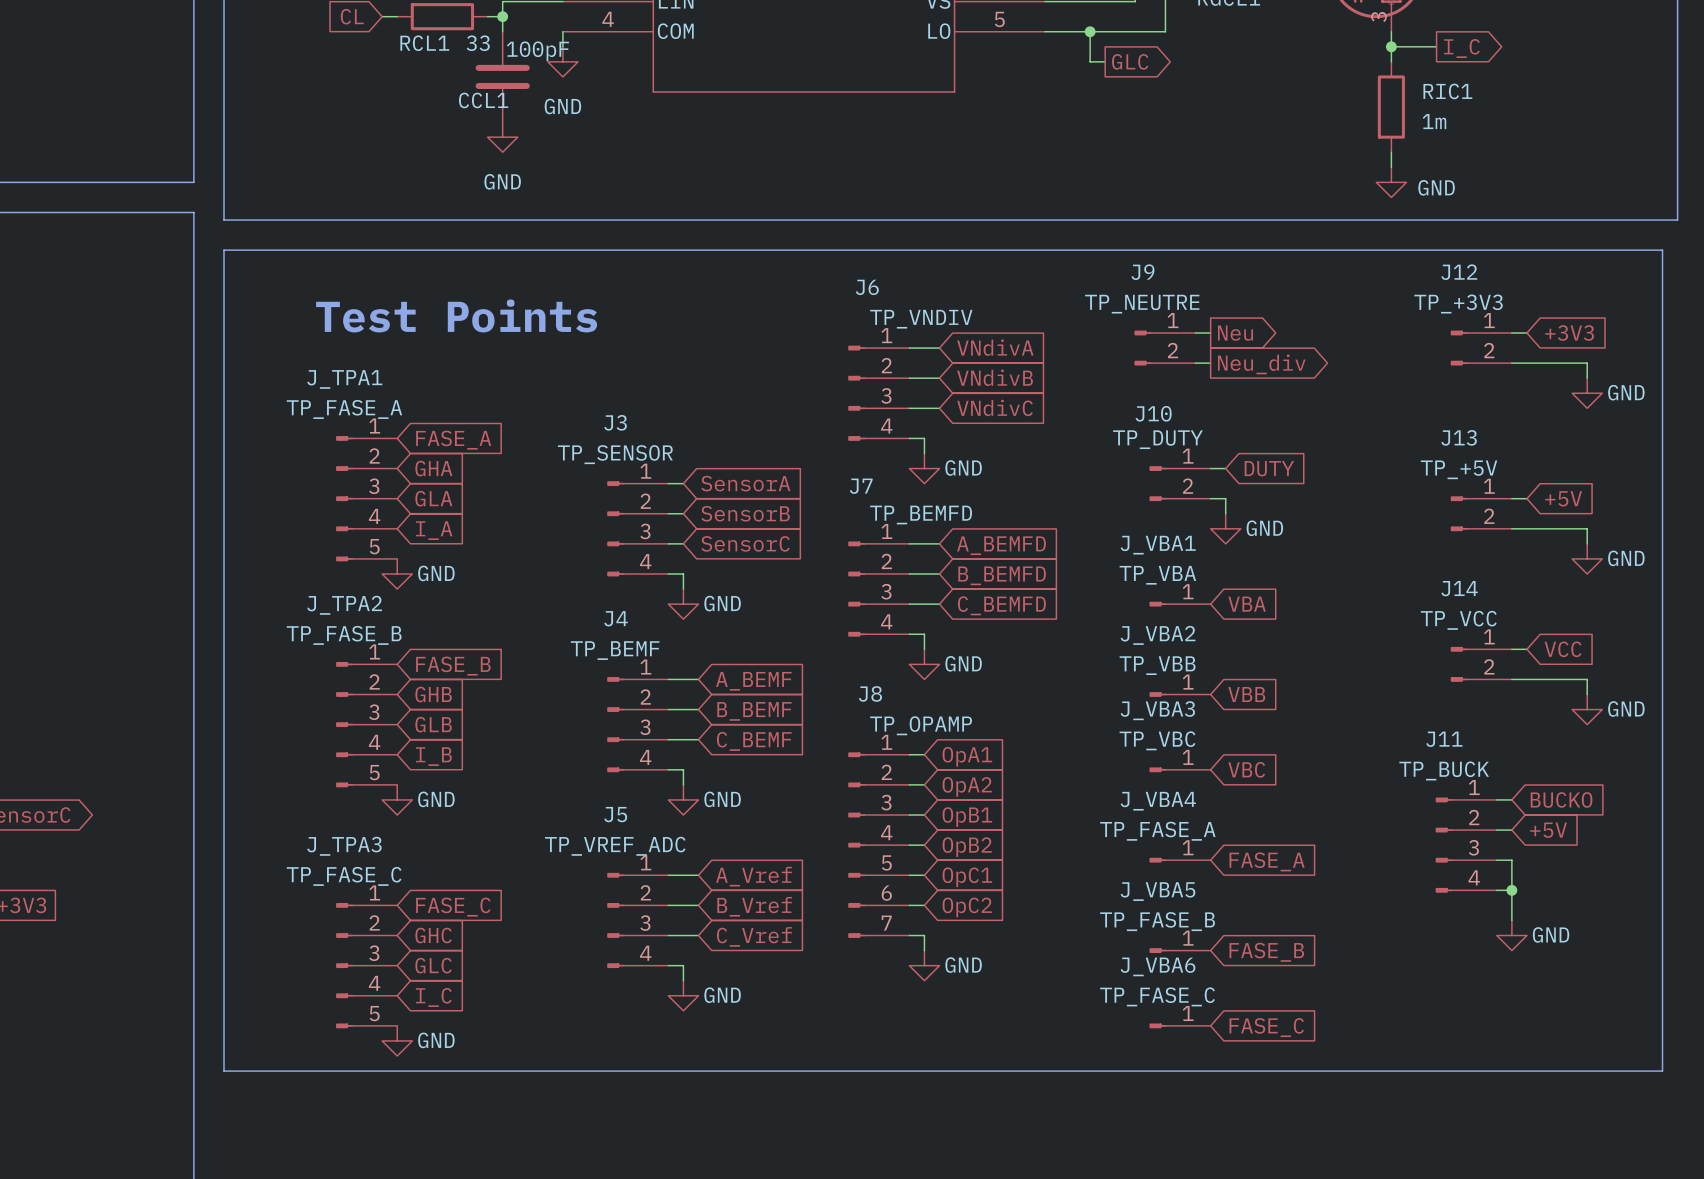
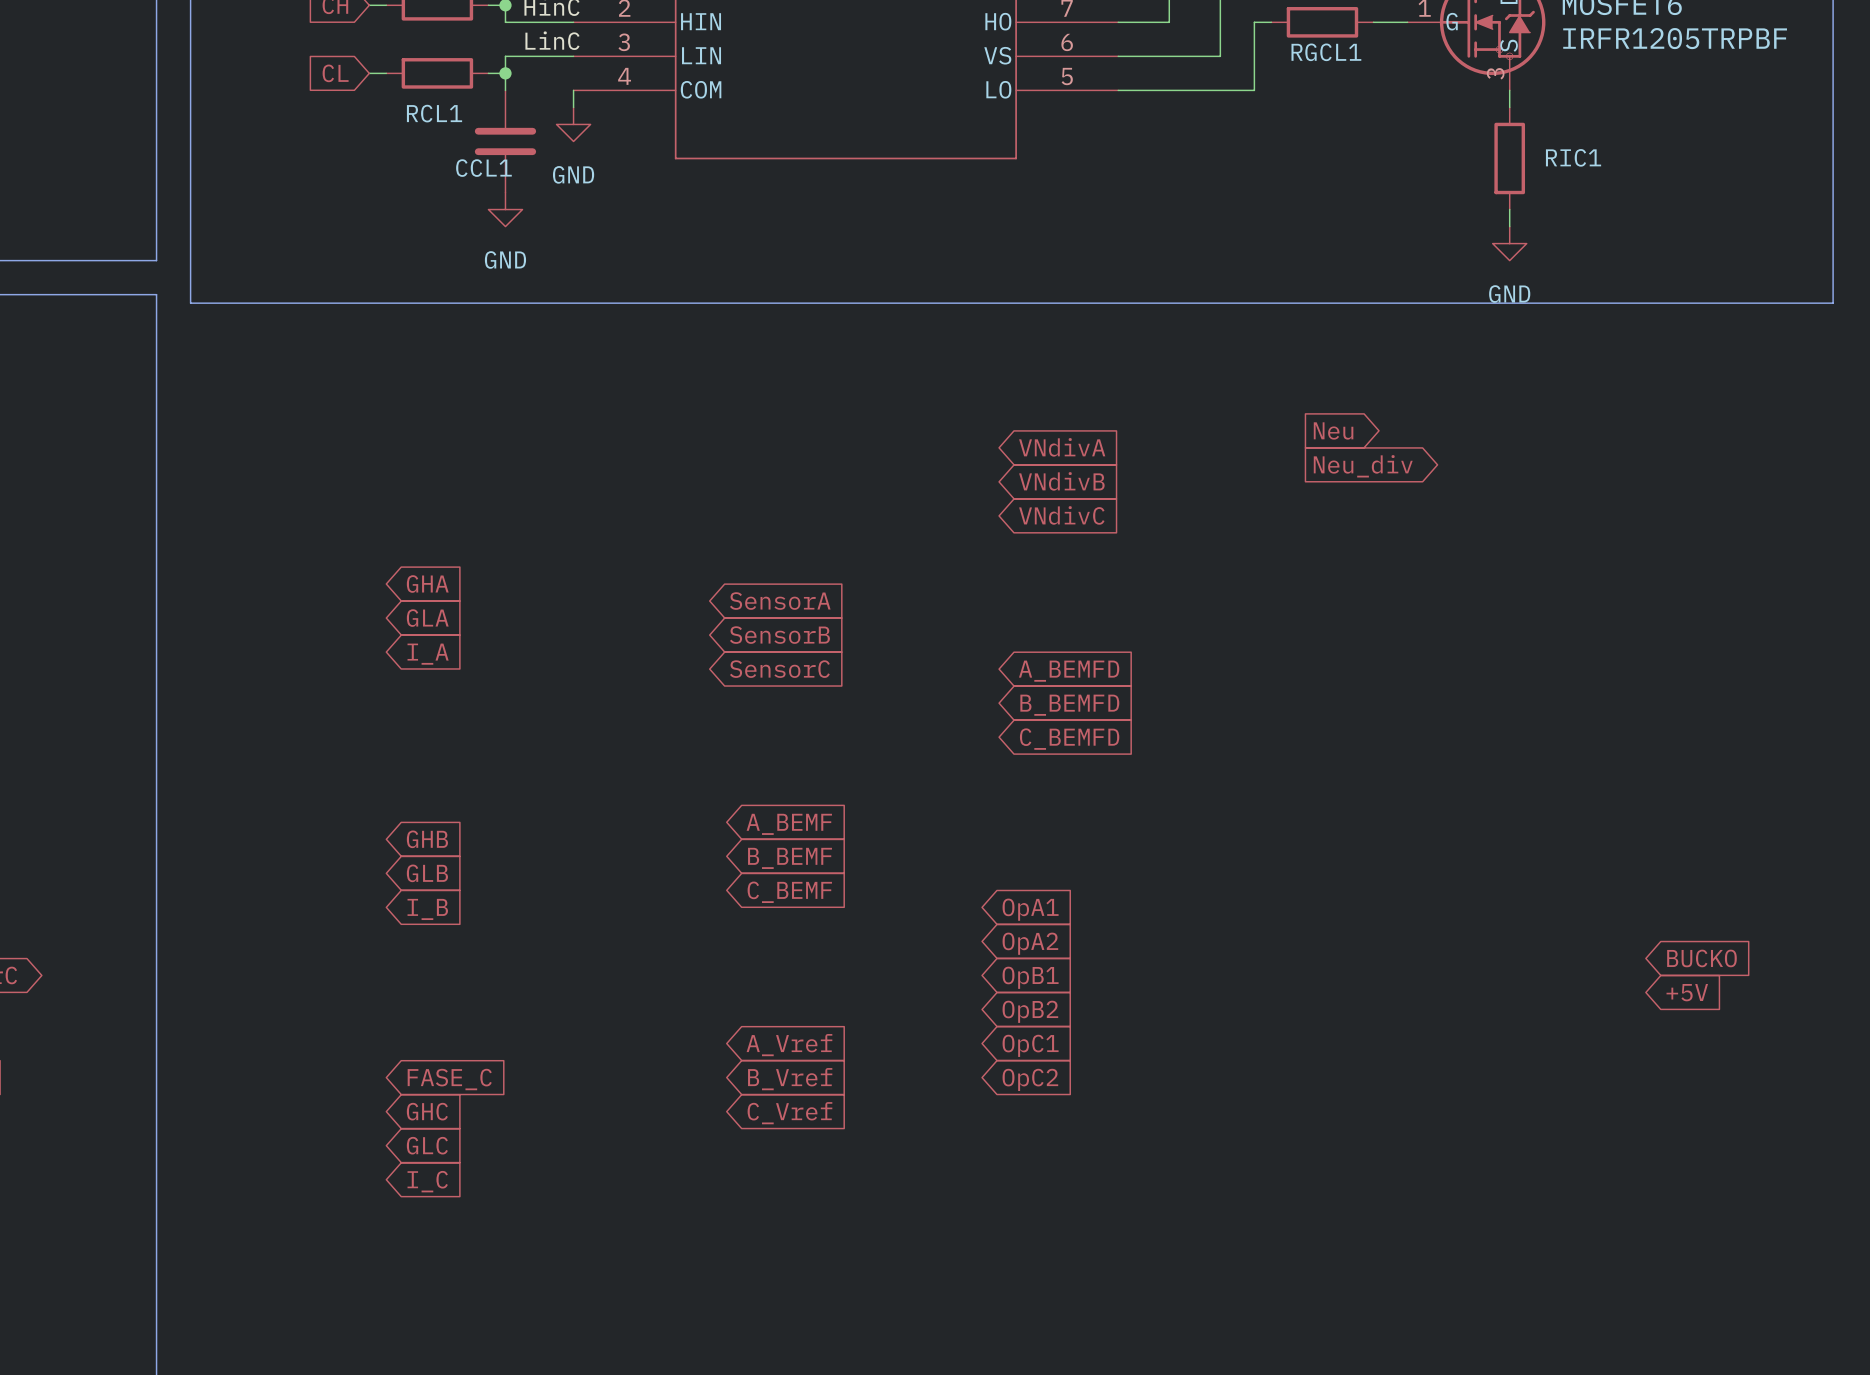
wire: (1090, 31) (1090, 61) (1105, 61) -> none
junction: (1090, 31) -> none
RCL1 name position: RCL1 (424, 43) -> RCL1 (434, 113)
RCL1 value: 33 (478, 43) -> none
junction: (1391, 46) -> none
wire: (1436, 46) (1391, 46) (1391, 61) -> none
global label: I_C (1461, 48) -> none
CCL1 value: 100pF (537, 51) -> none
global label: GLC (1130, 61) -> none
RIC1 position: (1391, 107) -> (1509, 158)
RIC1 value: 1m (1434, 121) -> none
power symbol position: GND (1391, 182) -> GND (1509, 243)
power symbol text position: GND (1436, 187) -> GND (1509, 294)
line: (224, 250) (224, 1071) (1662, 1071) (1662, 250) (224, 250) -> none
text: Test Points (456, 315) -> none
wire: (1195, 333) (1210, 333) -> none
wire: (1511, 333) (1526, 333) -> none
global label: +3V3 (1569, 333) -> none
wire: (909, 348) (939, 348) -> none
J9: TP_NEUTRE (1164, 348) -> none
J12: TP_+3V3 (1481, 348) -> none
wire: (1195, 363) (1210, 363) -> none
wire: (1511, 363) (1587, 363) (1587, 378) -> none
wire: (909, 378) (939, 378) -> none
J6: TP_VNDIV (878, 393) -> none
power symbol: GND (1587, 393) -> none
wire: (909, 408) (939, 408) -> none
wire: (909, 438) (924, 438) (924, 453) -> none
global label: FASE_A (453, 440) -> none
power symbol: GND (924, 468) -> none
wire: (1210, 468) (1225, 468) -> none
global label: DUTY (1269, 468) -> none
wire: (668, 483) (683, 483) -> none
J10: TP_DUTY (1180, 483) -> none
J_TPA1: TP_FASE_A (366, 498) -> none
wire: (1210, 498) (1225, 498) (1225, 513) -> none
wire: (1511, 498) (1526, 498) -> none
global label: +5V (1563, 498) -> none
wire: (668, 513) (683, 513) -> none
J13: TP_+5V (1481, 513) -> none
J3: TP_SENSOR (637, 528) -> none
power symbol: GND (1225, 528) -> none
wire: (1511, 528) (1587, 528) (1587, 543) -> none
wire: (668, 543) (683, 543) -> none
wire: (909, 543) (939, 543) -> none
power symbol: GND (1587, 558) -> none
power symbol: GND (397, 574) -> none
wire: (668, 574) (683, 574) (683, 589) -> none
wire: (909, 574) (939, 574) -> none
J7: TP_BEMFD (878, 589) -> none
power symbol: GND (683, 604) -> none
wire: (909, 604) (939, 604) -> none
J_VBA1: TP_VBA (1180, 604) -> none
global label: VBA (1247, 604) -> none
wire: (909, 634) (924, 634) (924, 649) -> none
wire: (1511, 649) (1526, 649) -> none
global label: VCC (1563, 649) -> none
power symbol: GND (924, 664) -> none
J14: TP_VCC (1481, 664) -> none
global label: FASE_B (453, 666) -> none
wire: (668, 679) (698, 679) -> none
wire: (1511, 679) (1587, 679) (1587, 694) -> none
J_VBA2: TP_VBB (1180, 694) -> none
global label: VBB (1246, 694) -> none
wire: (668, 709) (698, 709) -> none
power symbol: GND (1587, 709) -> none
J_TPA2: TP_FASE_B (366, 724) -> none
J4: TP_BEMF (637, 724) -> none
wire: (668, 739) (698, 739) -> none
wire: (909, 754) (924, 754) -> none
wire: (668, 769) (683, 769) (683, 784) -> none
J_VBA3: TP_VBC (1180, 769) -> none
global label: VBC (1246, 769) -> none
wire: (909, 784) (924, 784) -> none
power symbol: GND (397, 799) -> none
power symbol: GND (683, 799) -> none
wire: (1496, 799) (1511, 799) -> none
wire: (909, 815) (924, 815) -> none
wire: (1496, 830) (1511, 830) -> none
J8: TP_OPAMP (878, 845) -> none
wire: (909, 845) (924, 845) -> none
J11: TP_BUCK (1466, 845) -> none
J_VBA4: TP_FASE_A (1180, 860) -> none
wire: (1496, 860) (1511, 860) (1511, 920) -> none
global label: FASE_A (1267, 861) -> none
wire: (668, 875) (698, 875) -> none
wire: (909, 875) (924, 875) -> none
wire: (1496, 890) (1511, 890) -> none
junction: (1511, 890) -> none
wire: (668, 905) (698, 905) -> none
wire: (909, 905) (924, 905) -> none
J5: TP_VREF_ADC (637, 920) -> none
wire: (668, 935) (698, 935) -> none
wire: (909, 935) (924, 935) (924, 950) -> none
power symbol: GND (1511, 935) -> none
J_VBA5: TP_FASE_B (1180, 950) -> none
global label: FASE_B (1266, 952) -> none
J_TPA3: TP_FASE_C (366, 965) -> none
wire: (668, 965) (683, 965) (683, 980) -> none
power symbol: GND (924, 965) -> none
power symbol: GND (683, 995) -> none
J_VBA6: TP_FASE_C (1180, 1025) -> none
global label: FASE_C (1266, 1027) -> none
power symbol: GND (397, 1040) -> none

